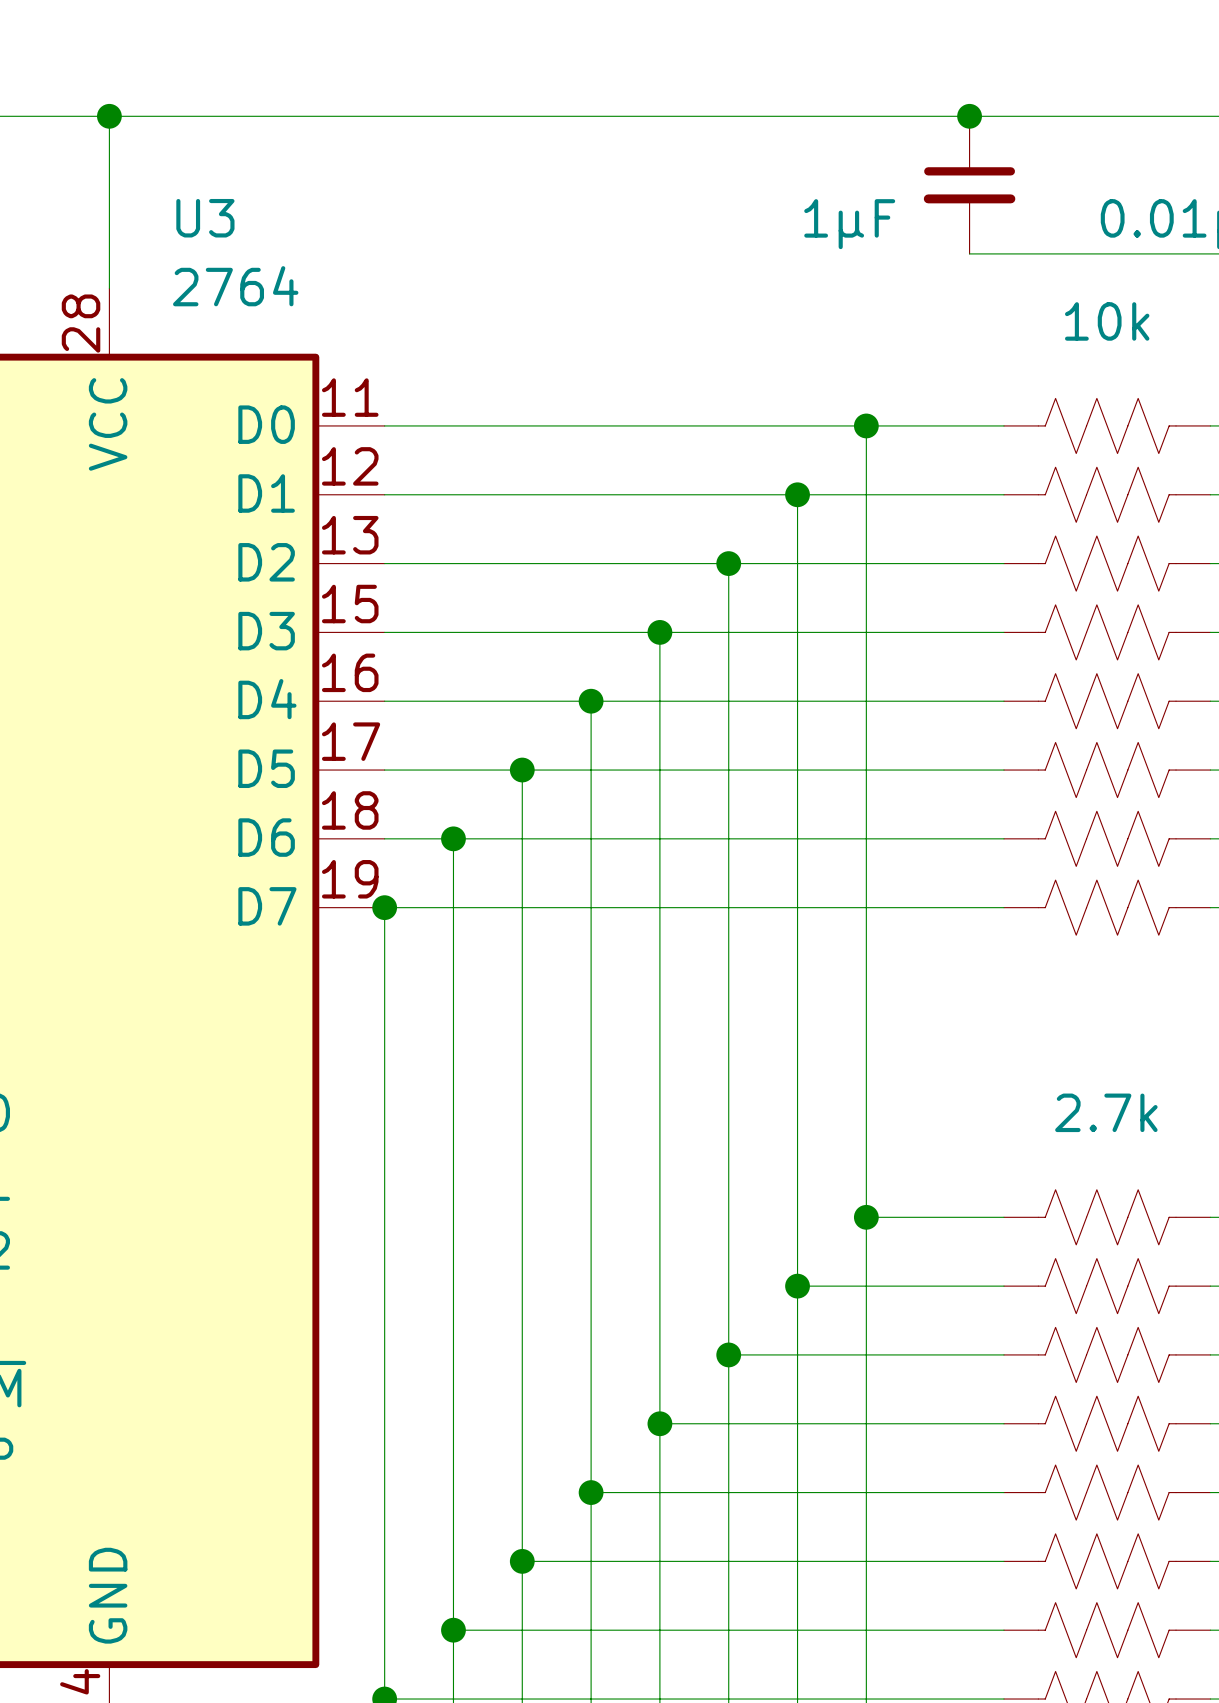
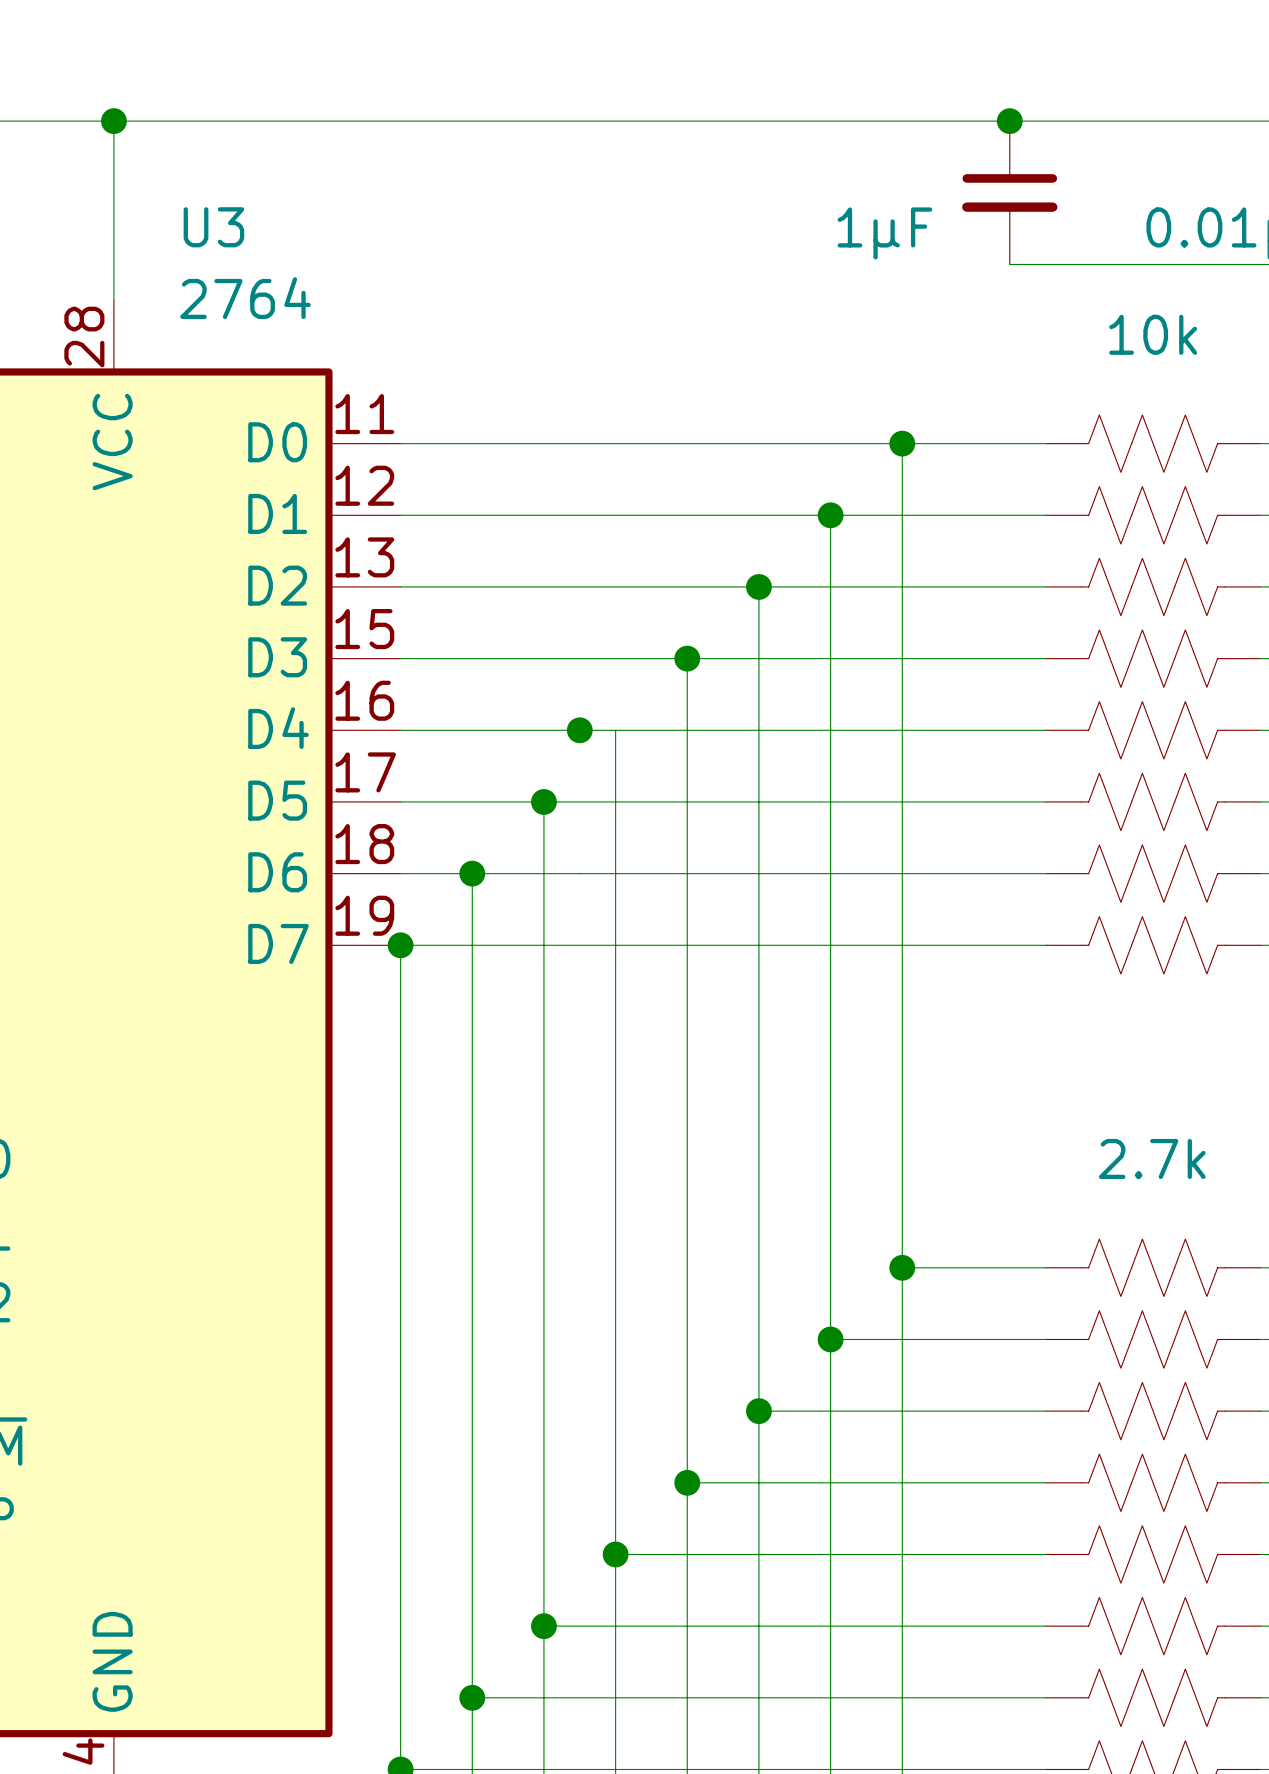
junction position: (591, 701) -> (579, 730)

